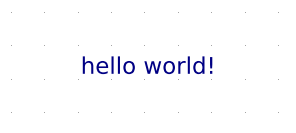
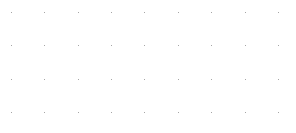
text: hello world! (147, 65) -> none

